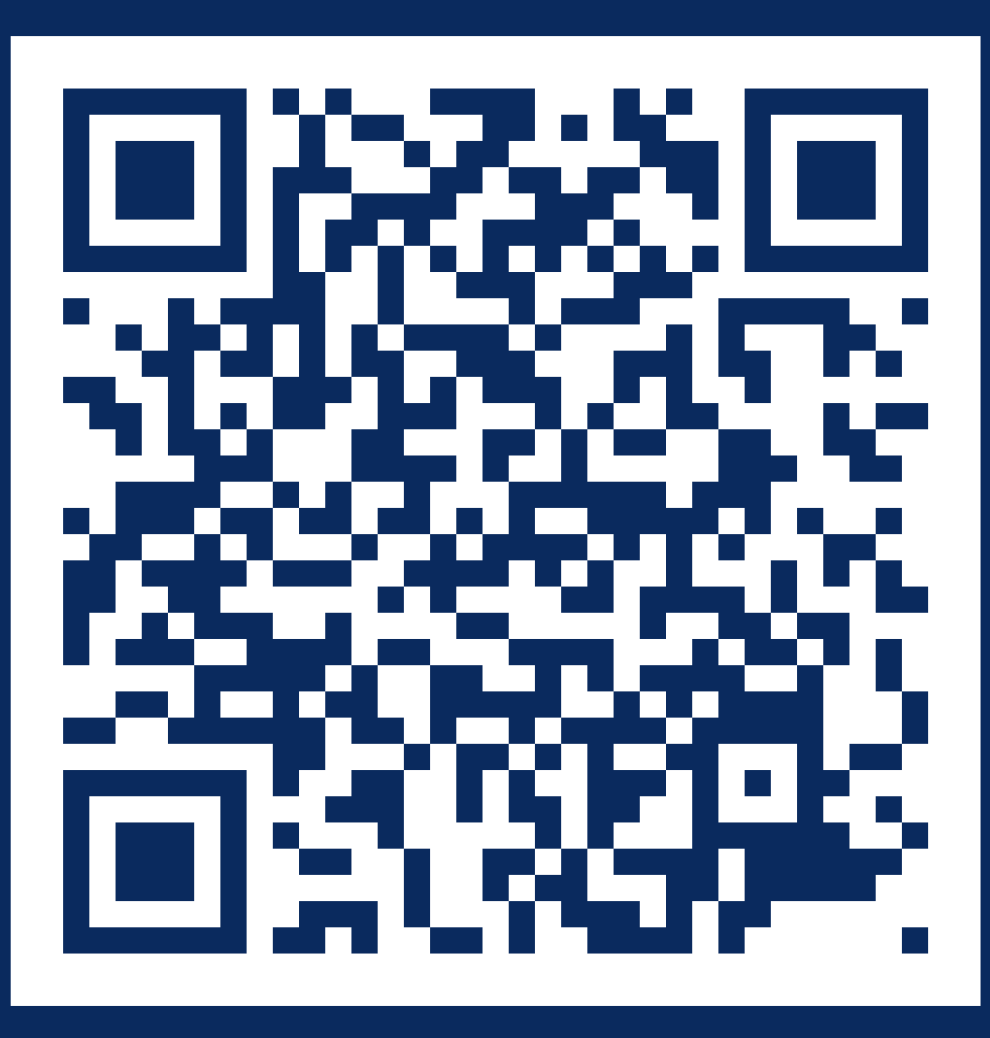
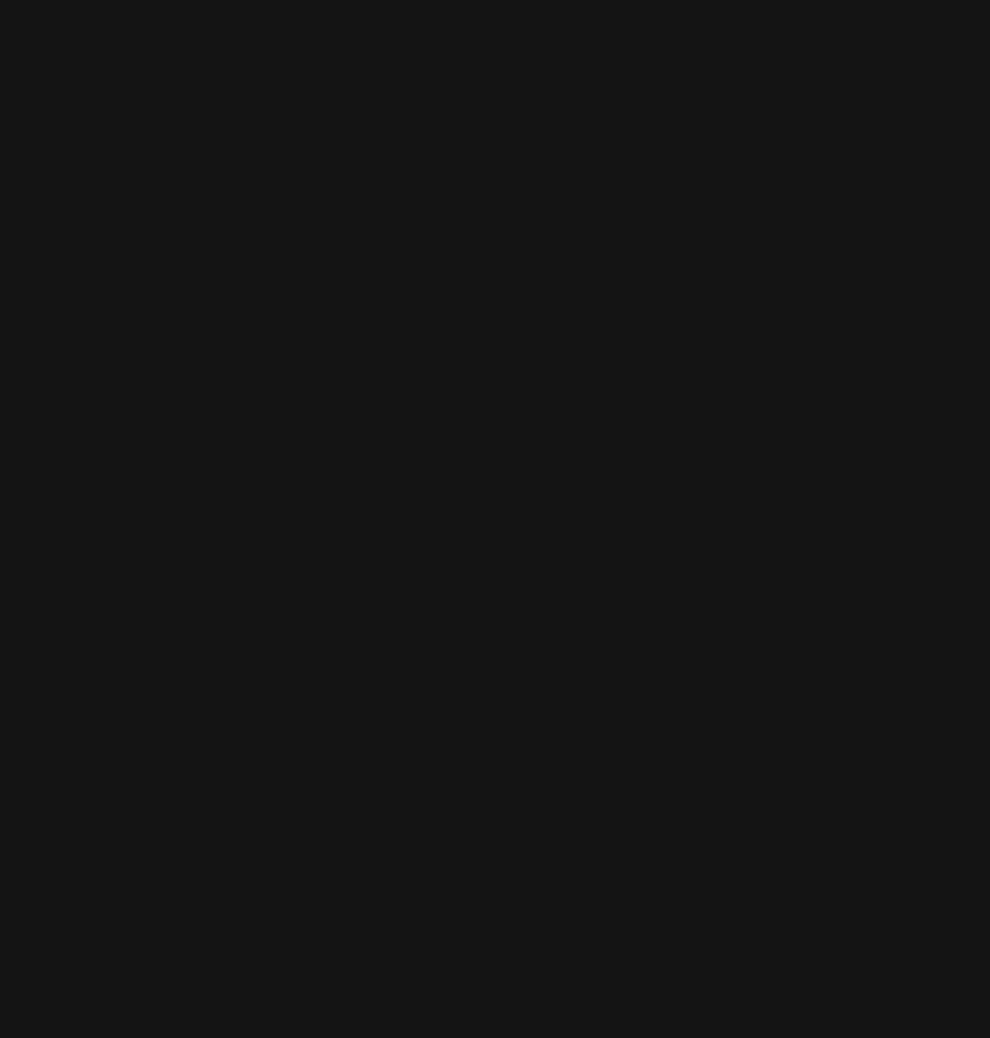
drawing: [10, 36, 981, 1006] -> none

